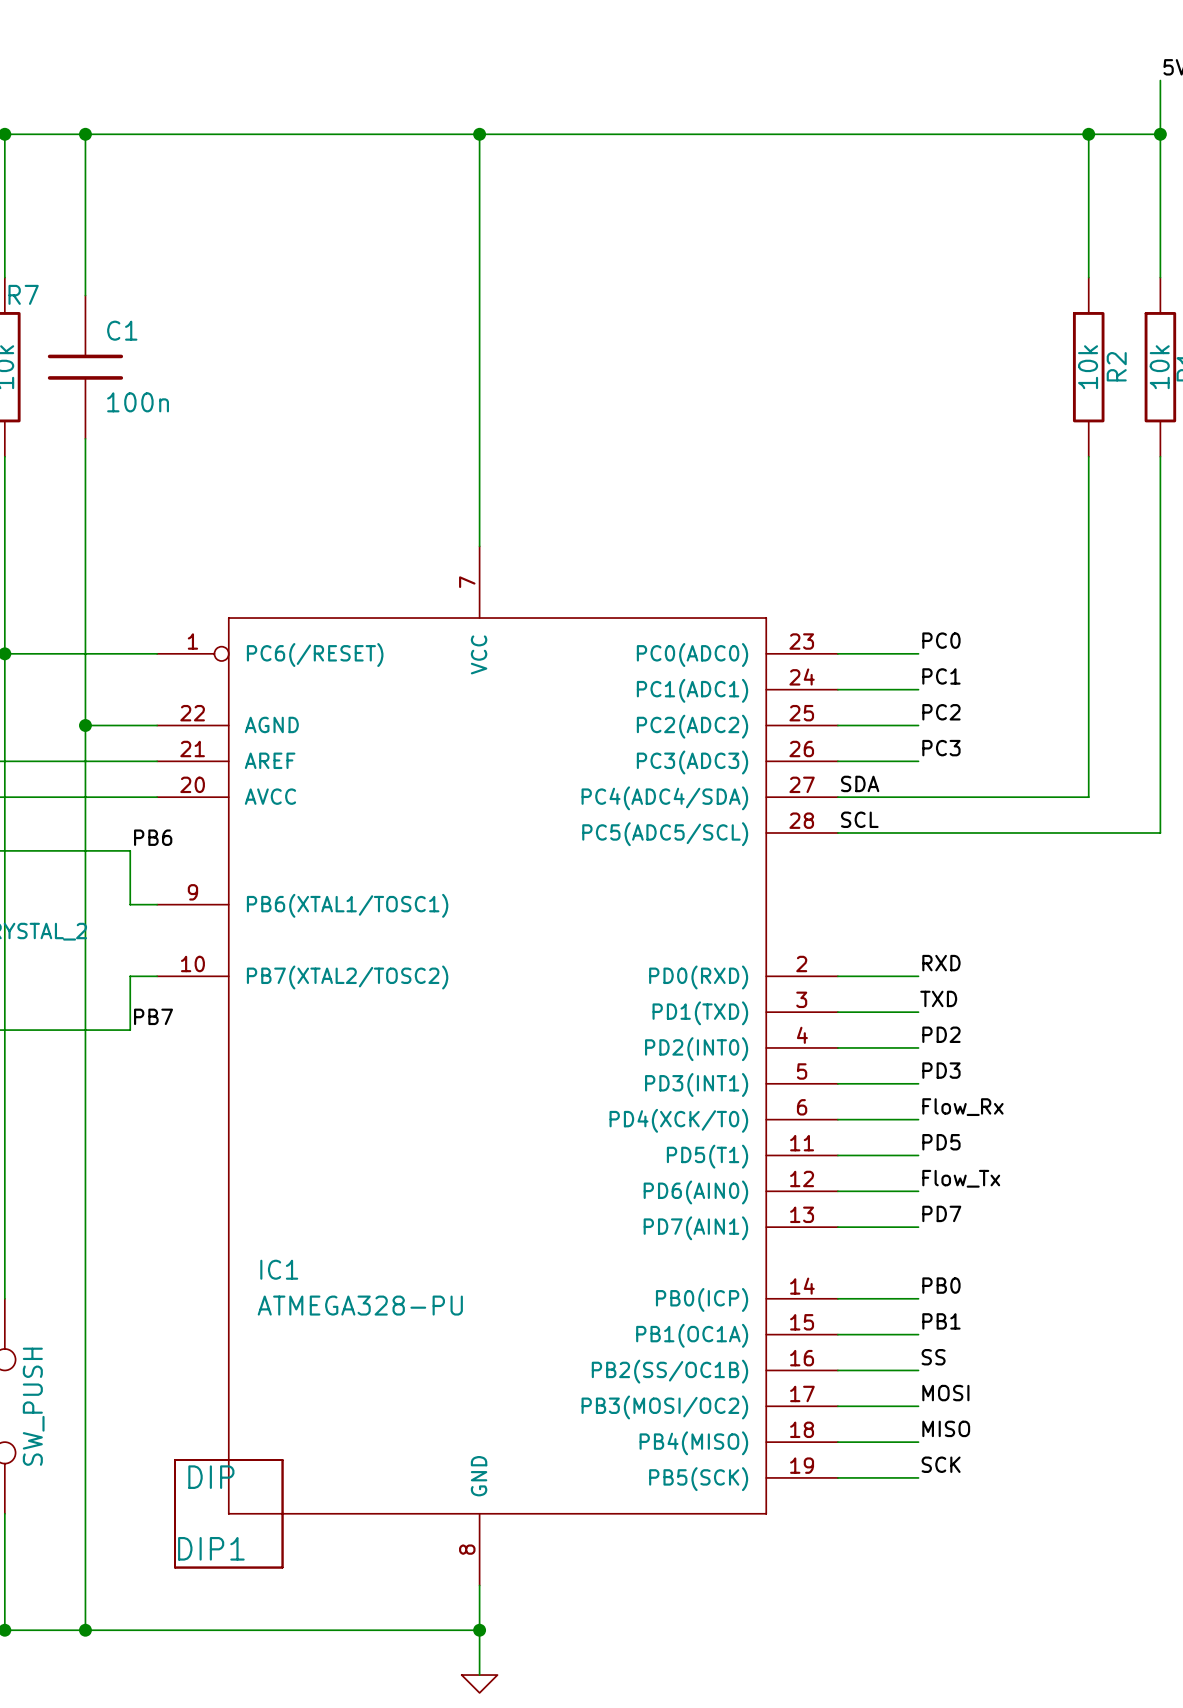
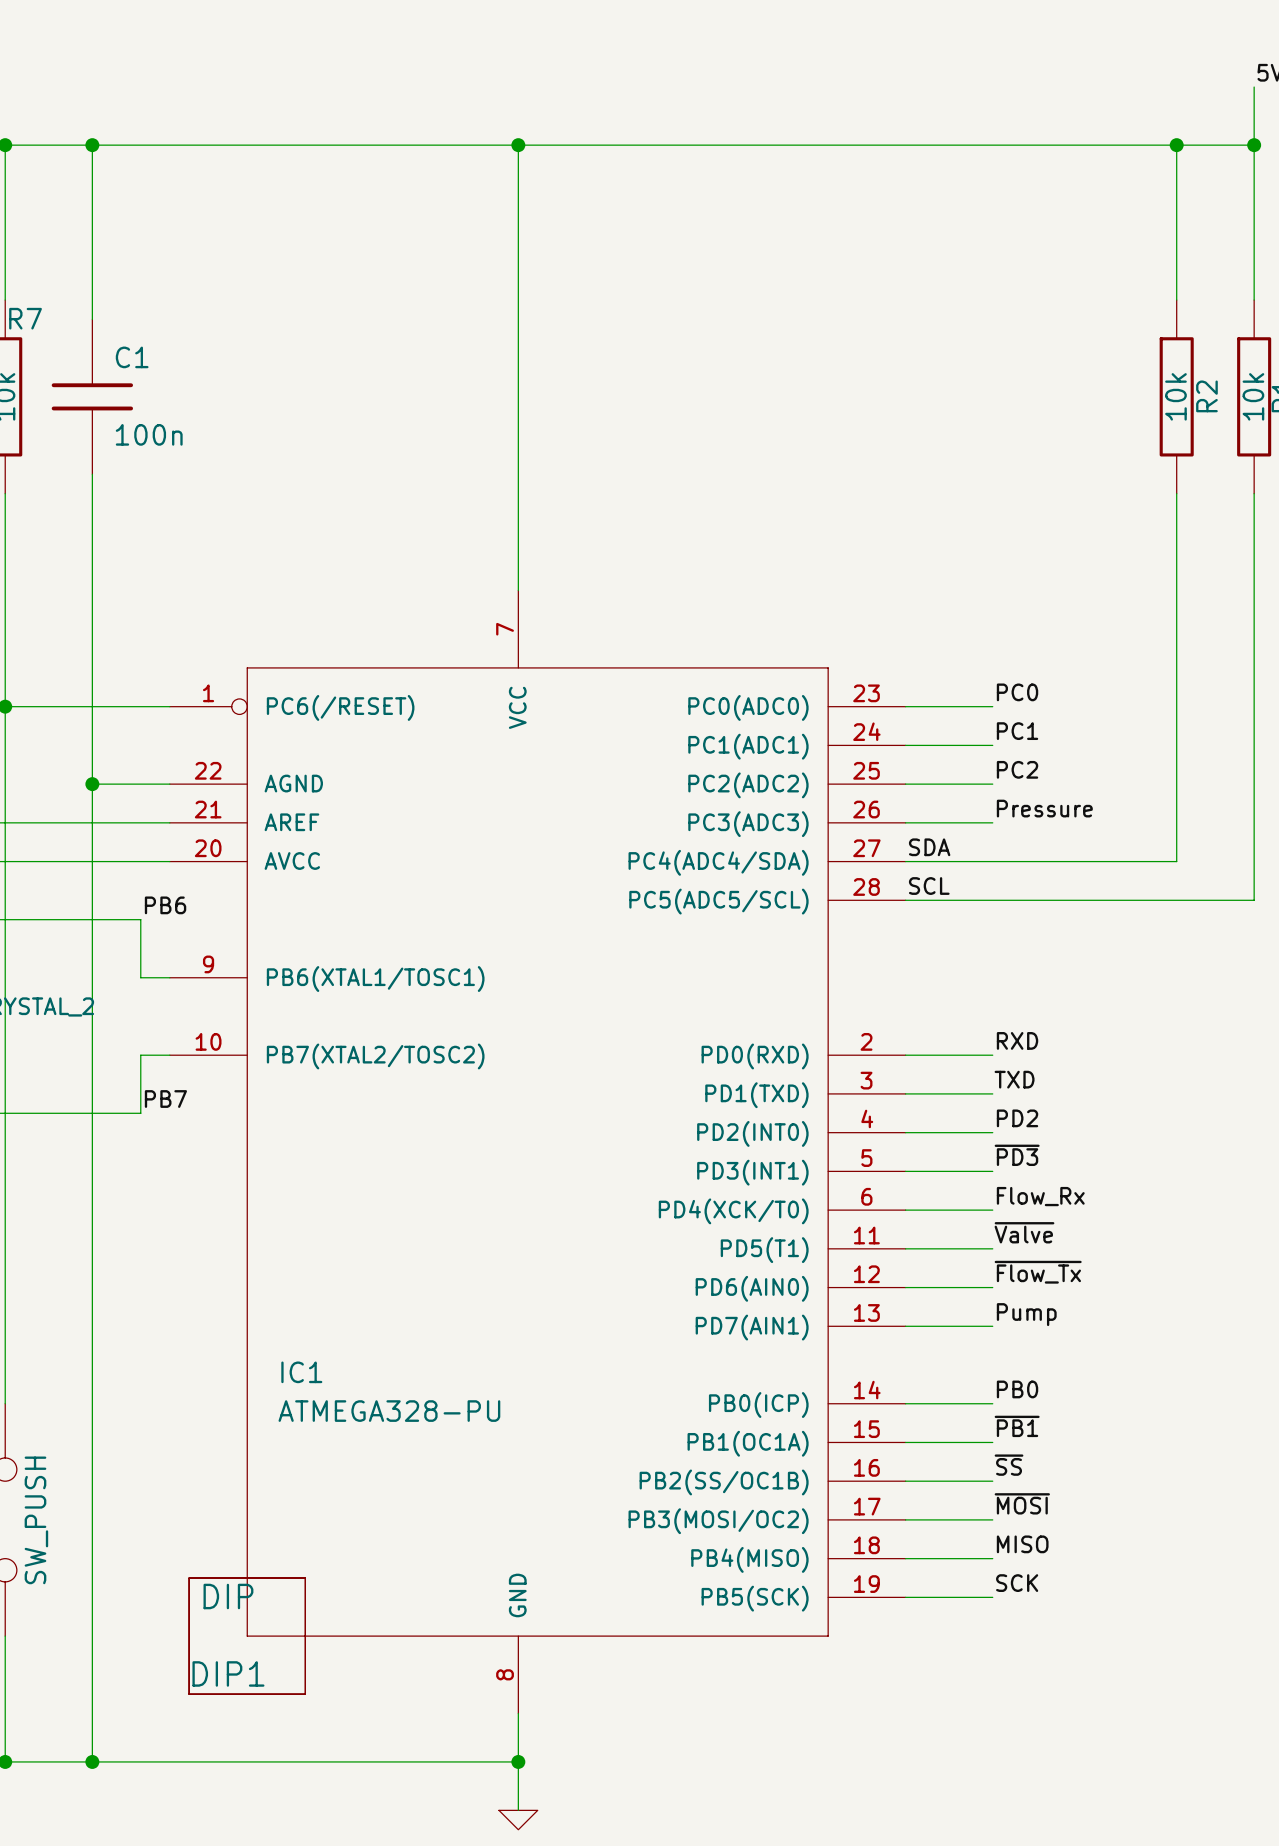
label: PC3 (941, 748) -> Pressure (1044, 808)
label: PD3 (941, 1070) -> ~{PD3} (1017, 1155)
label: PD5 (941, 1142) -> ~{Valve} (1024, 1232)
label: Flow_Tx (961, 1178) -> ~{Flow_Tx} (1038, 1272)
label: PD7 (941, 1213) -> Pump (1026, 1314)
label: PB1 (941, 1321) -> ~{PB1} (1017, 1426)
label: SS (933, 1357) -> ~{SS} (1009, 1465)
label: MOSI (945, 1393) -> ~{MOSI} (1022, 1503)

